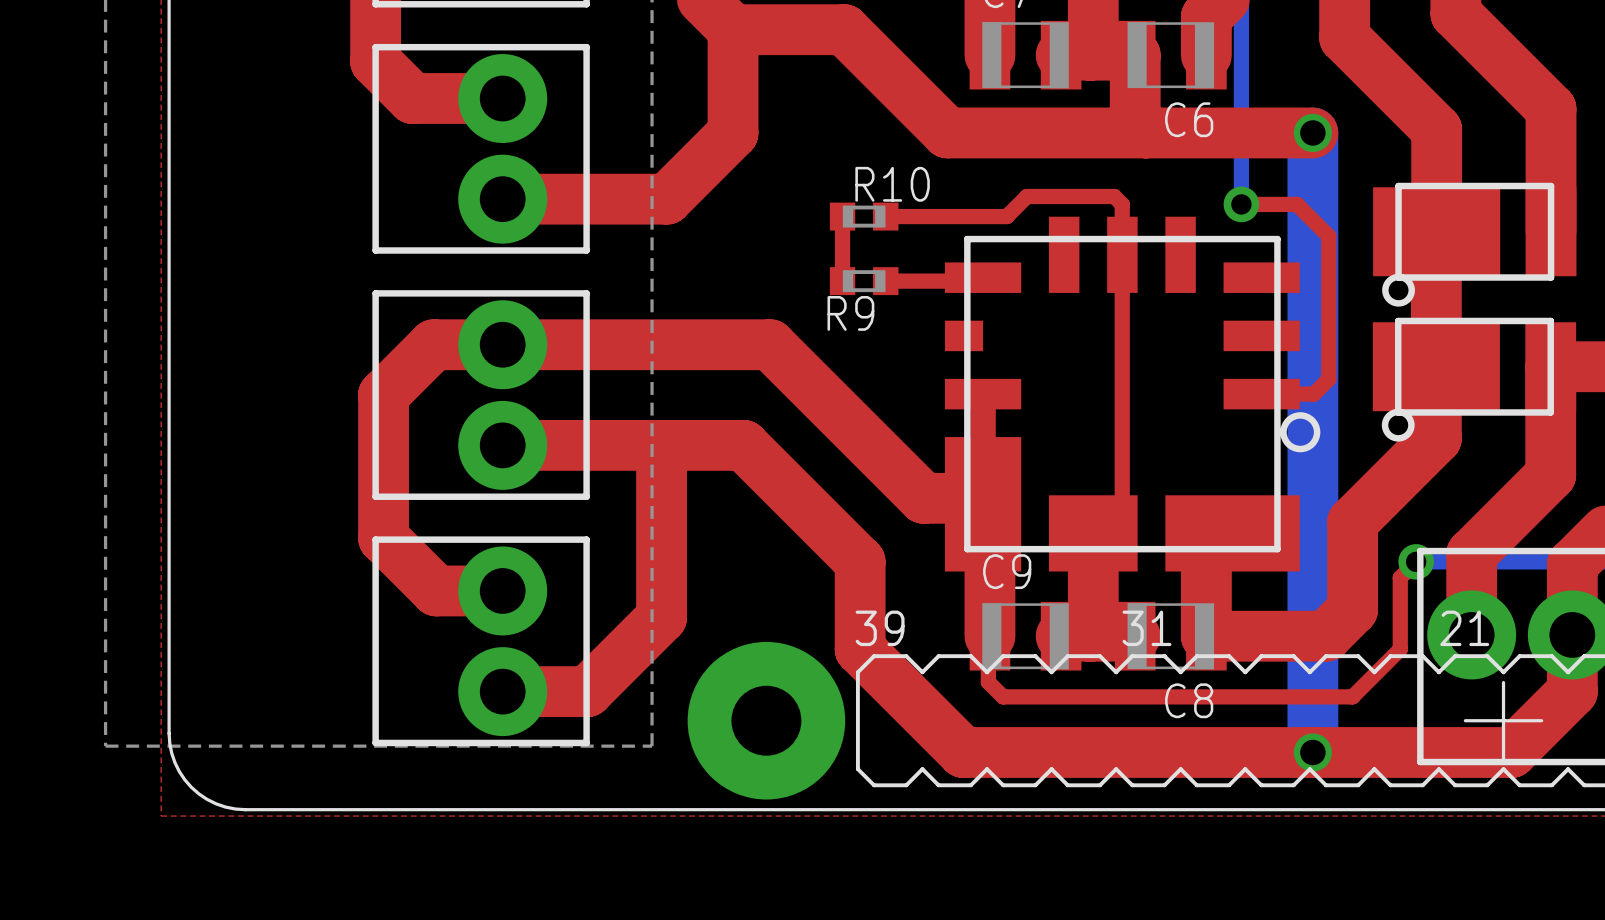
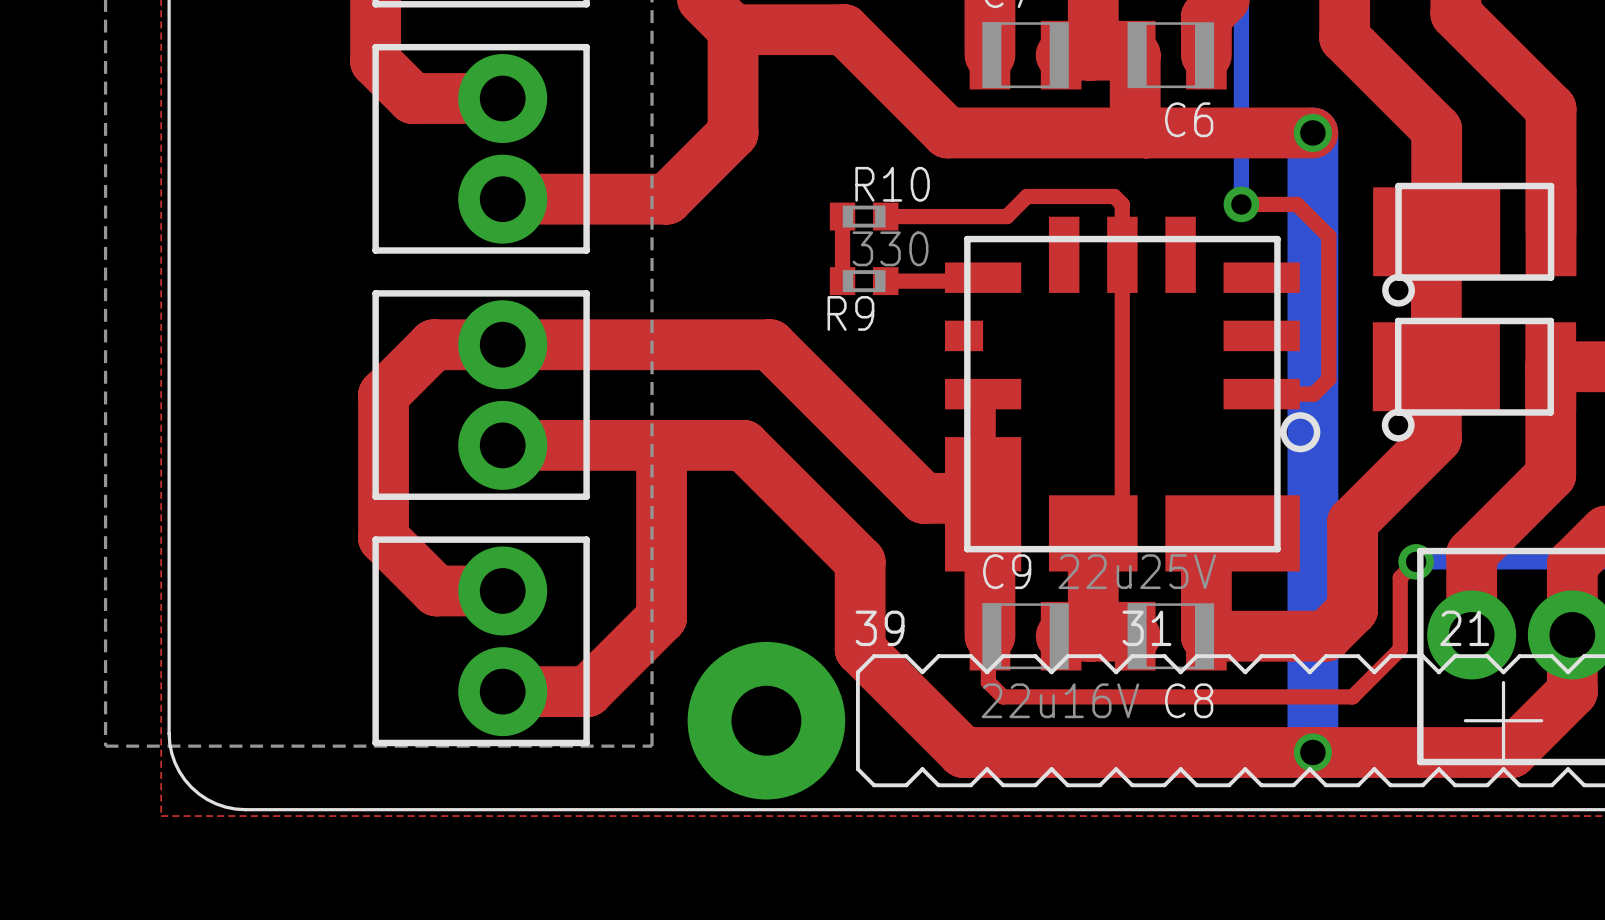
R10 value: none -> 330 (890, 248)
C8 value: none -> 22u25V (1137, 571)
C9 value: none -> 22u16V (1060, 700)

